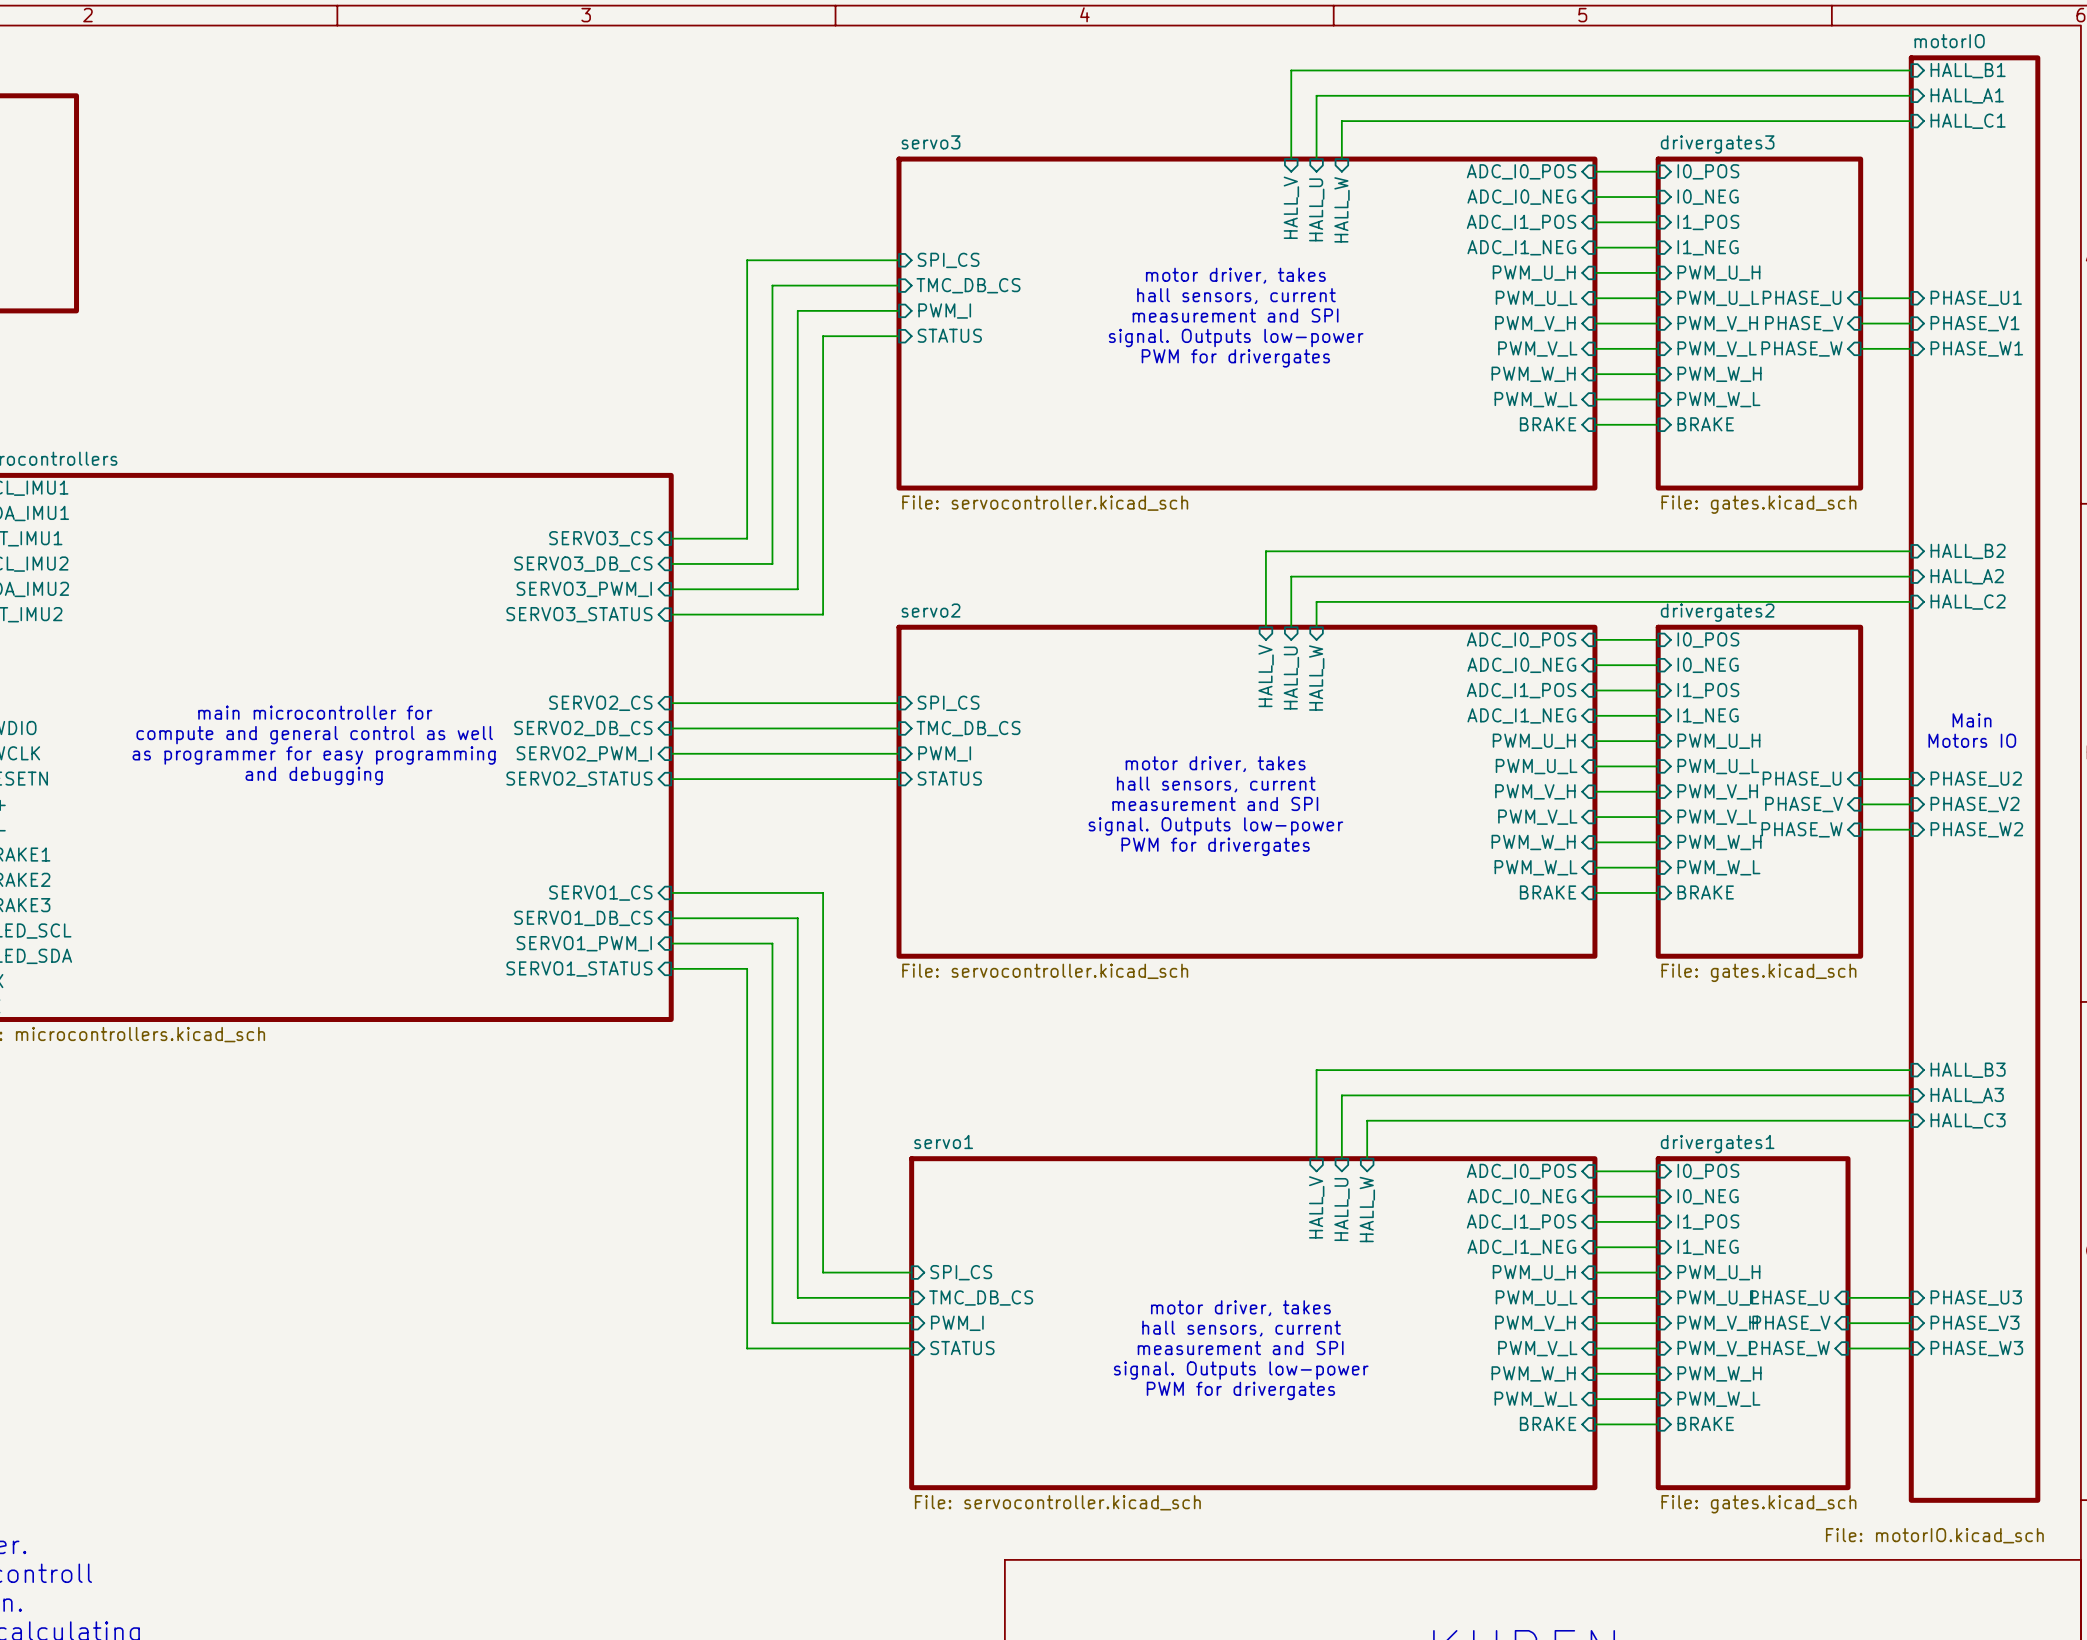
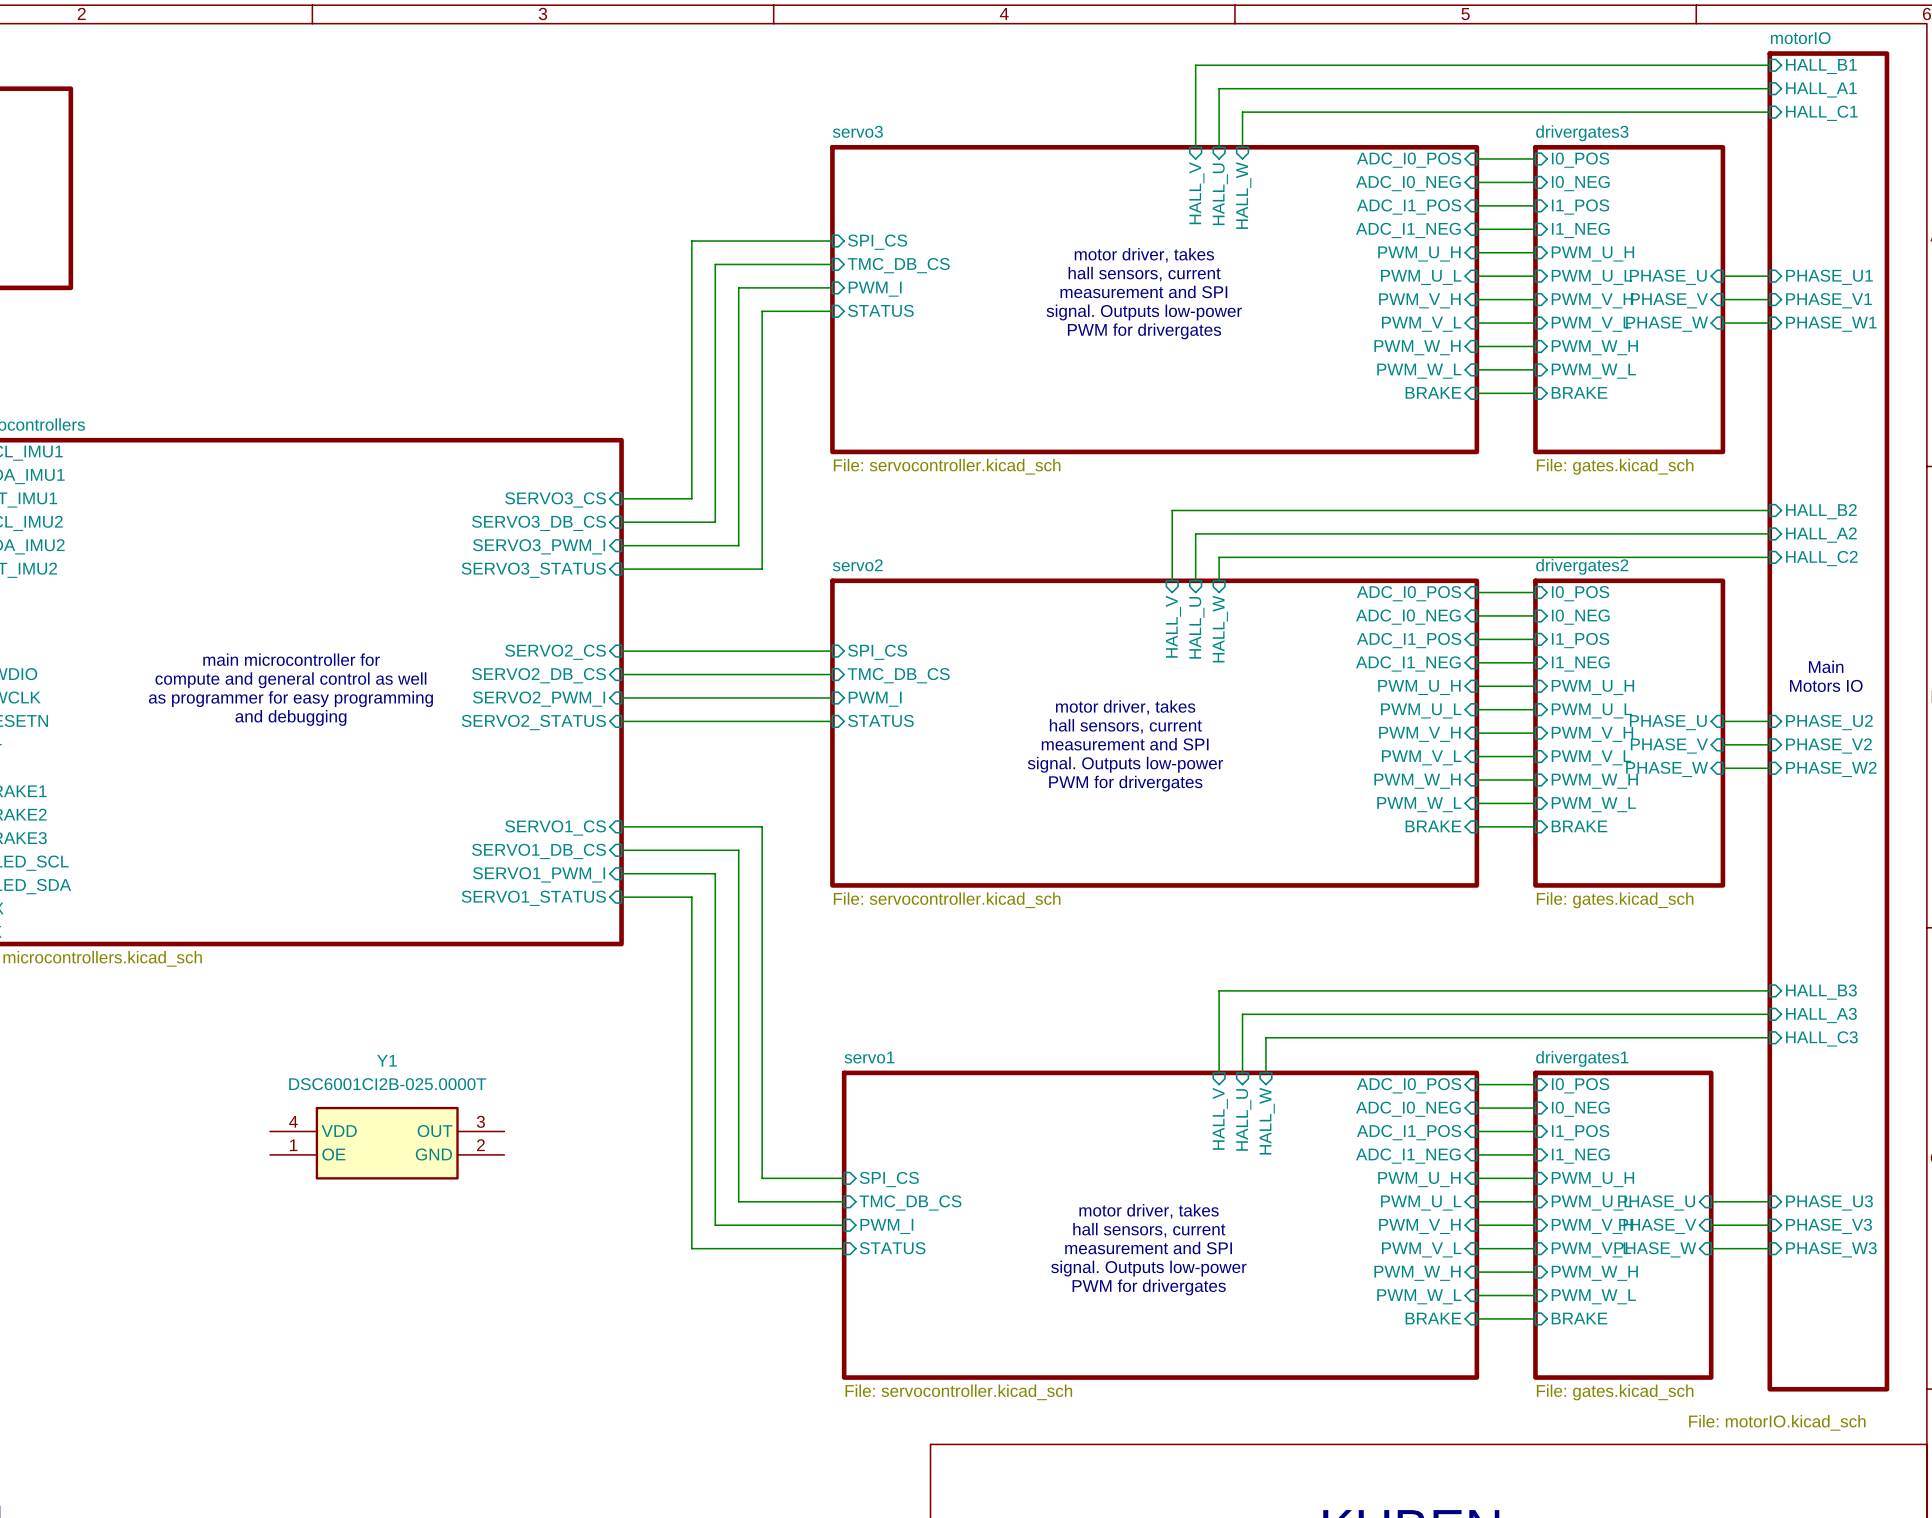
Y1: none -> DSC6001CI2B-025.0000T (387, 1143)

